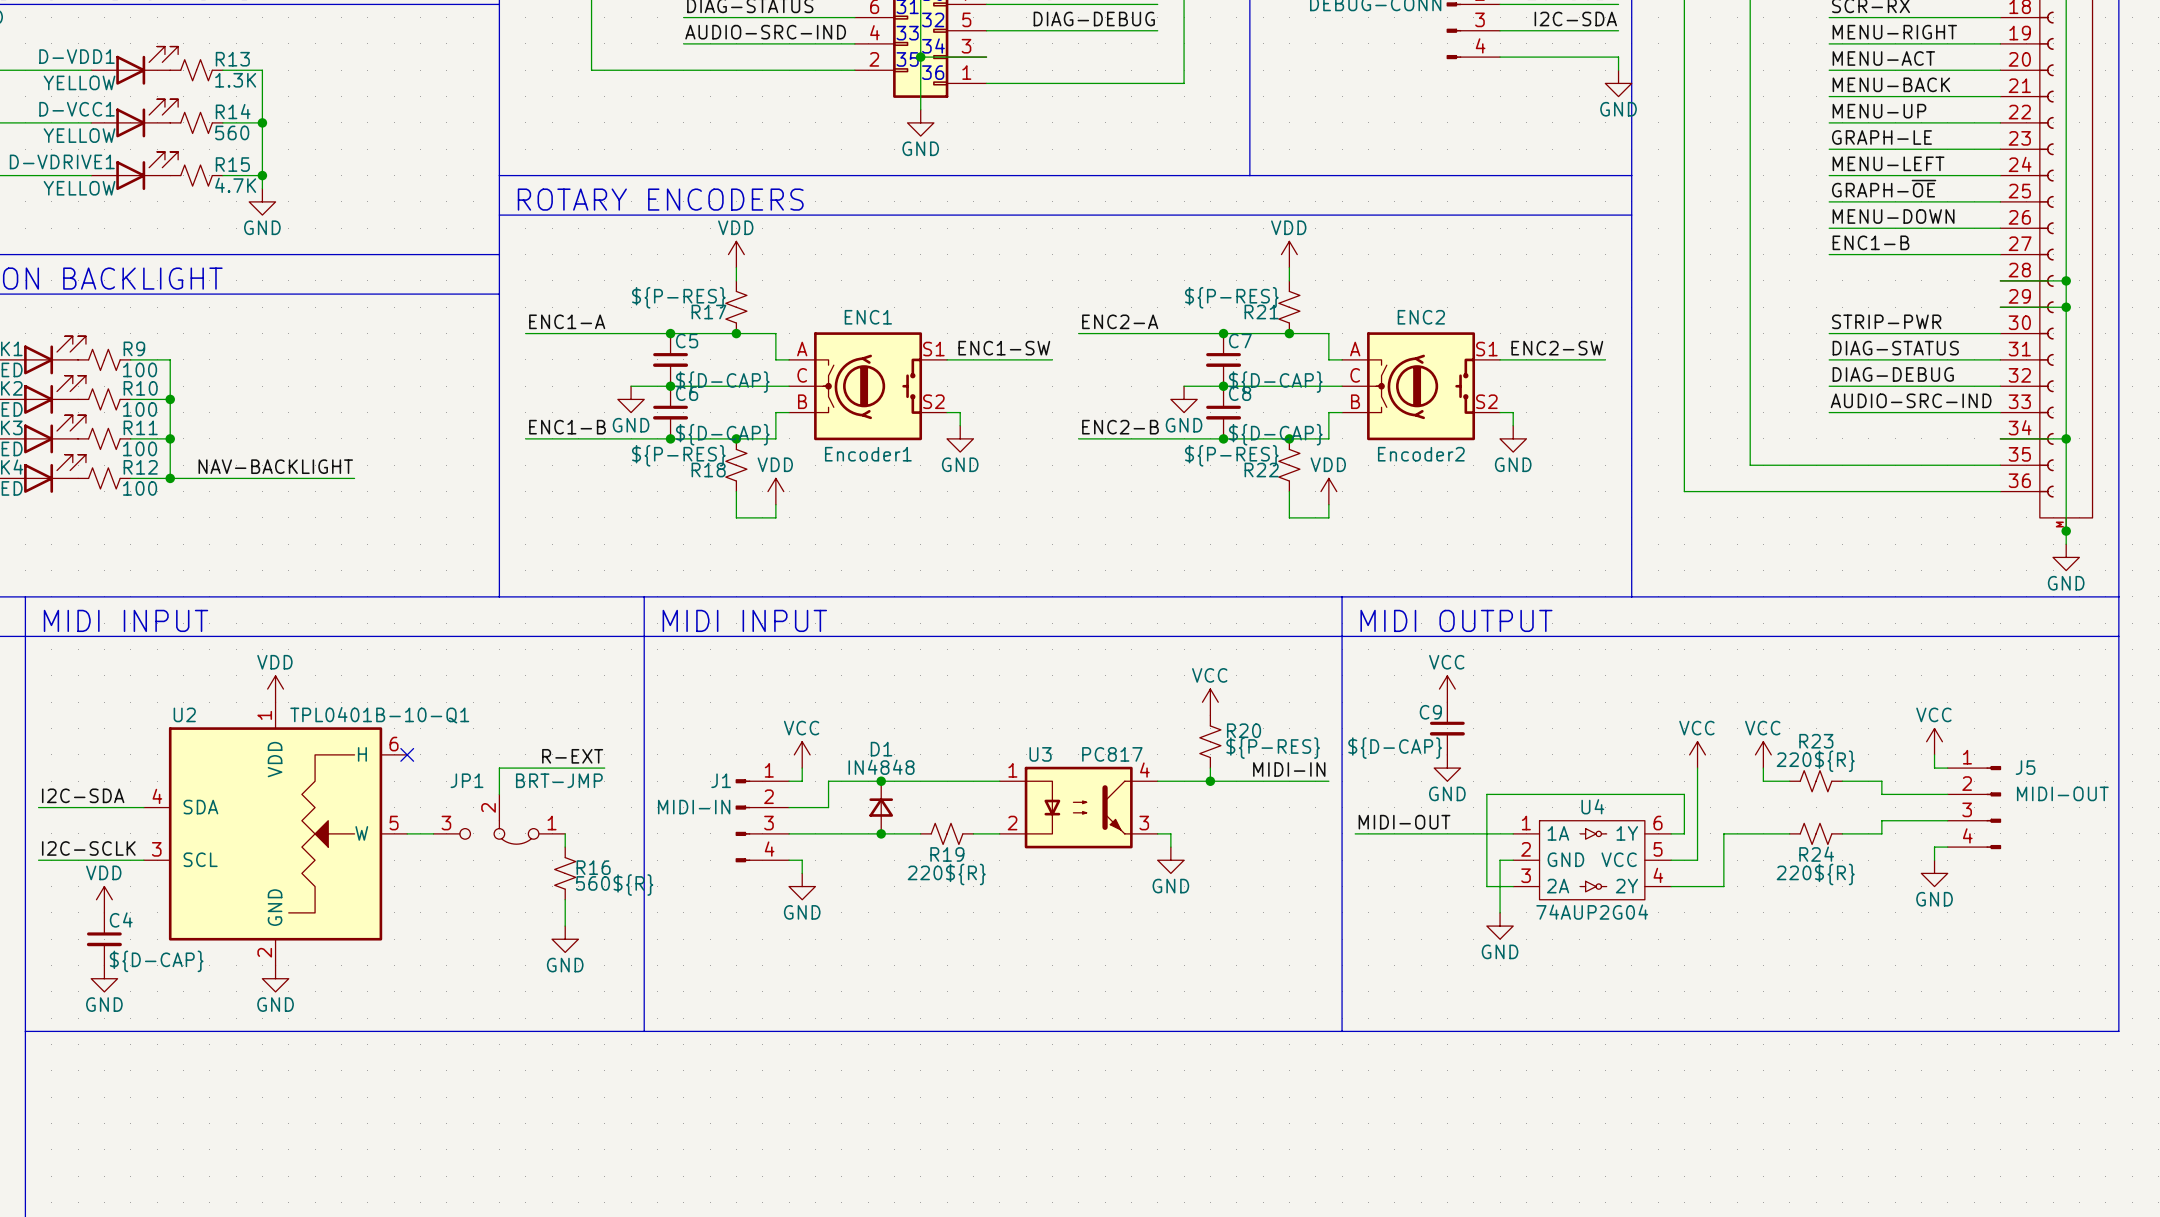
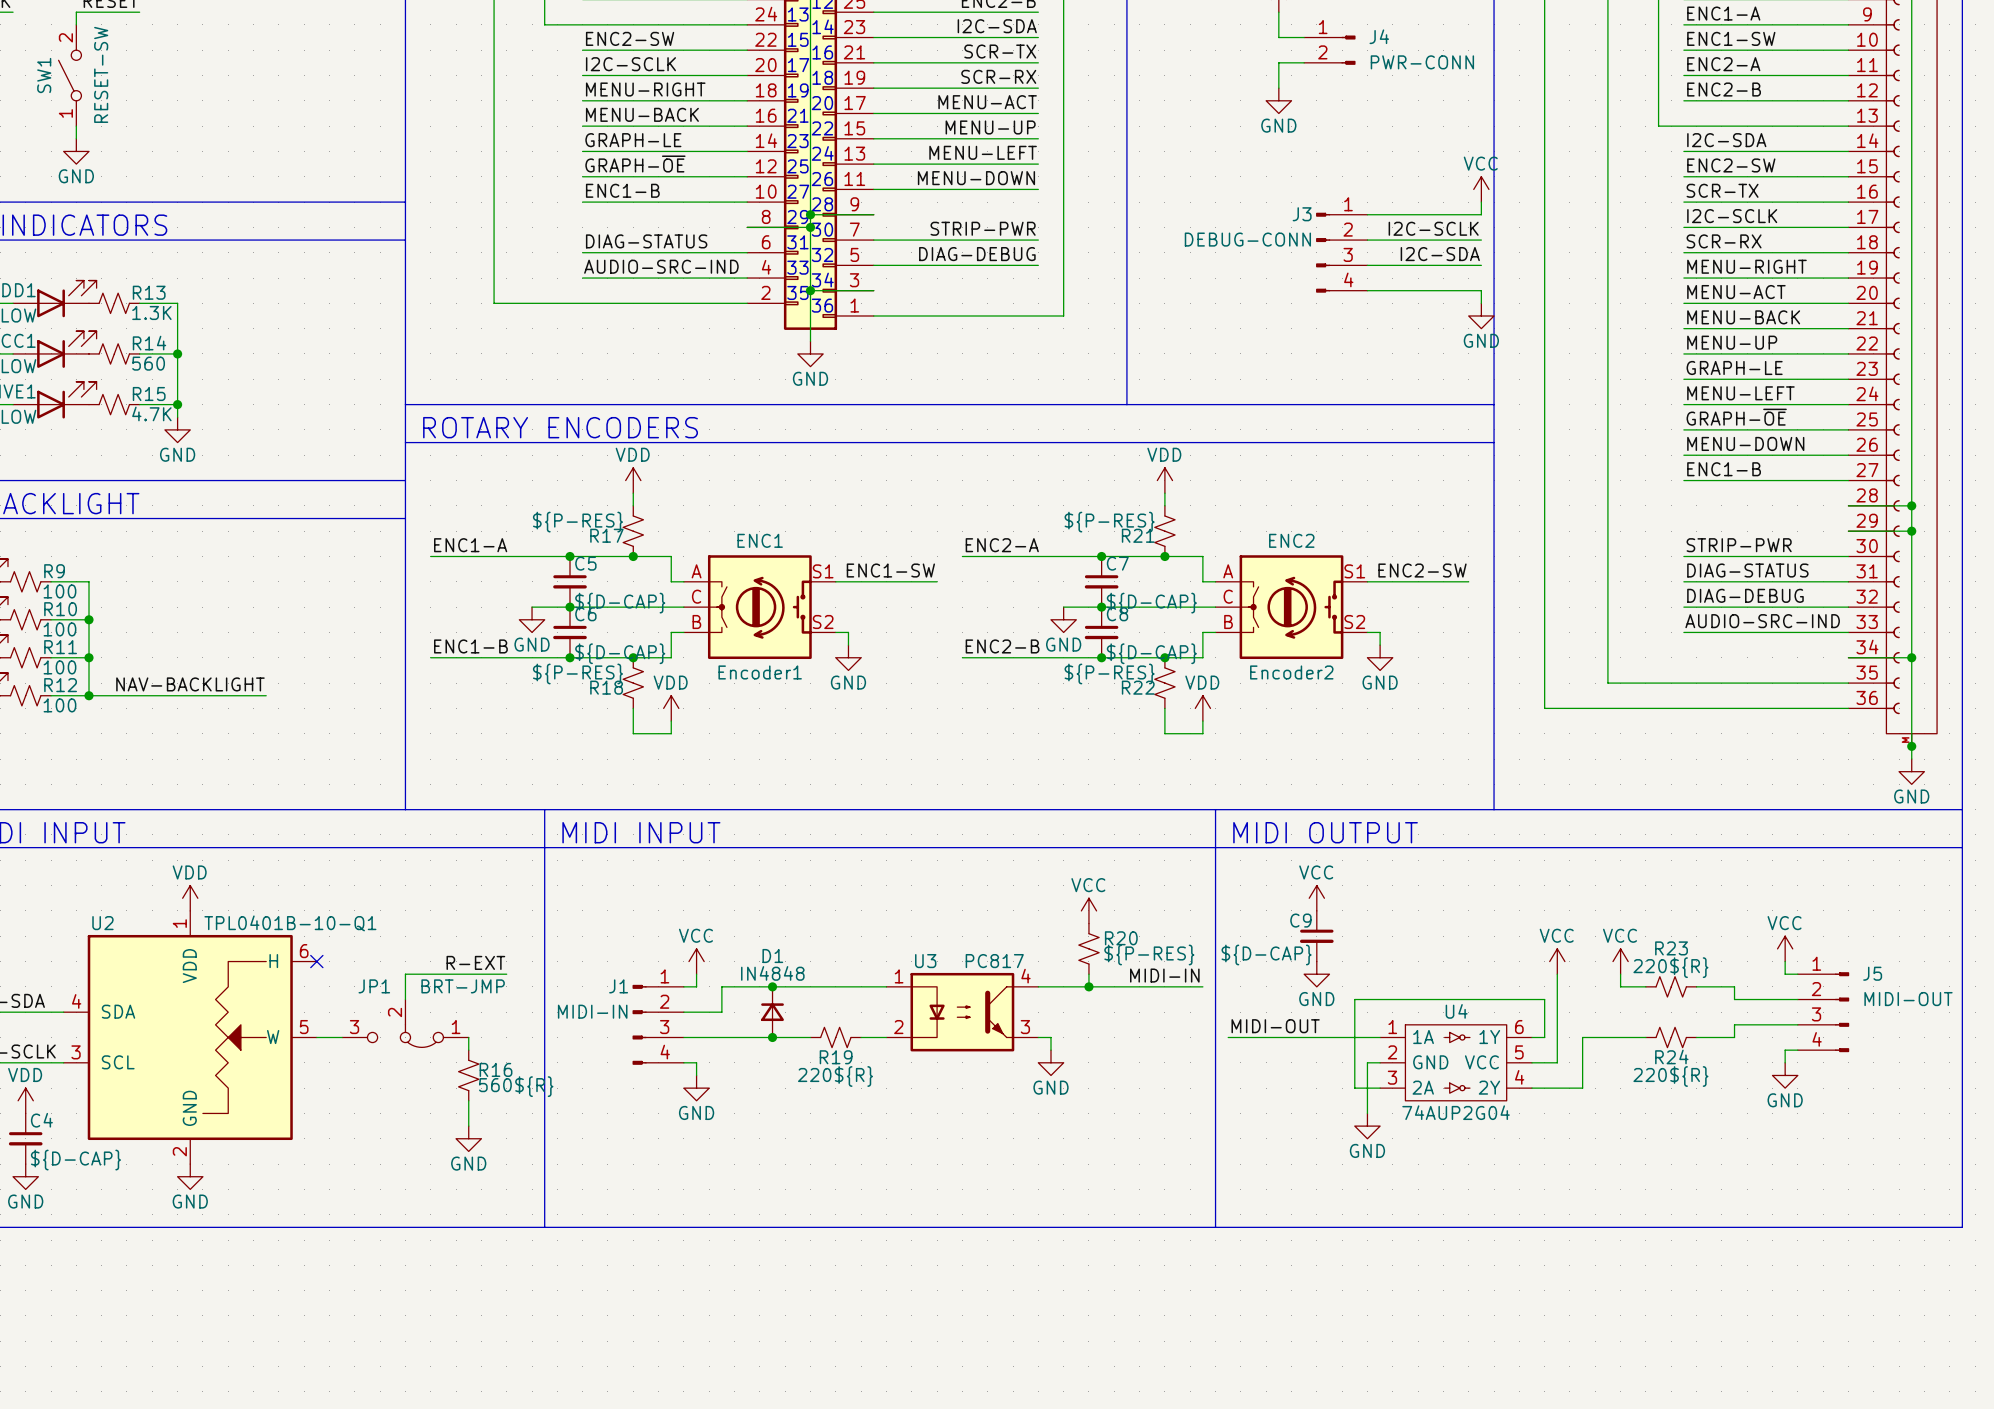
ENC1 symbol: [789, 332, 948, 441] -> [683, 555, 836, 660]
ENC2 symbol: [1342, 332, 1501, 441] -> [1215, 555, 1368, 660]

